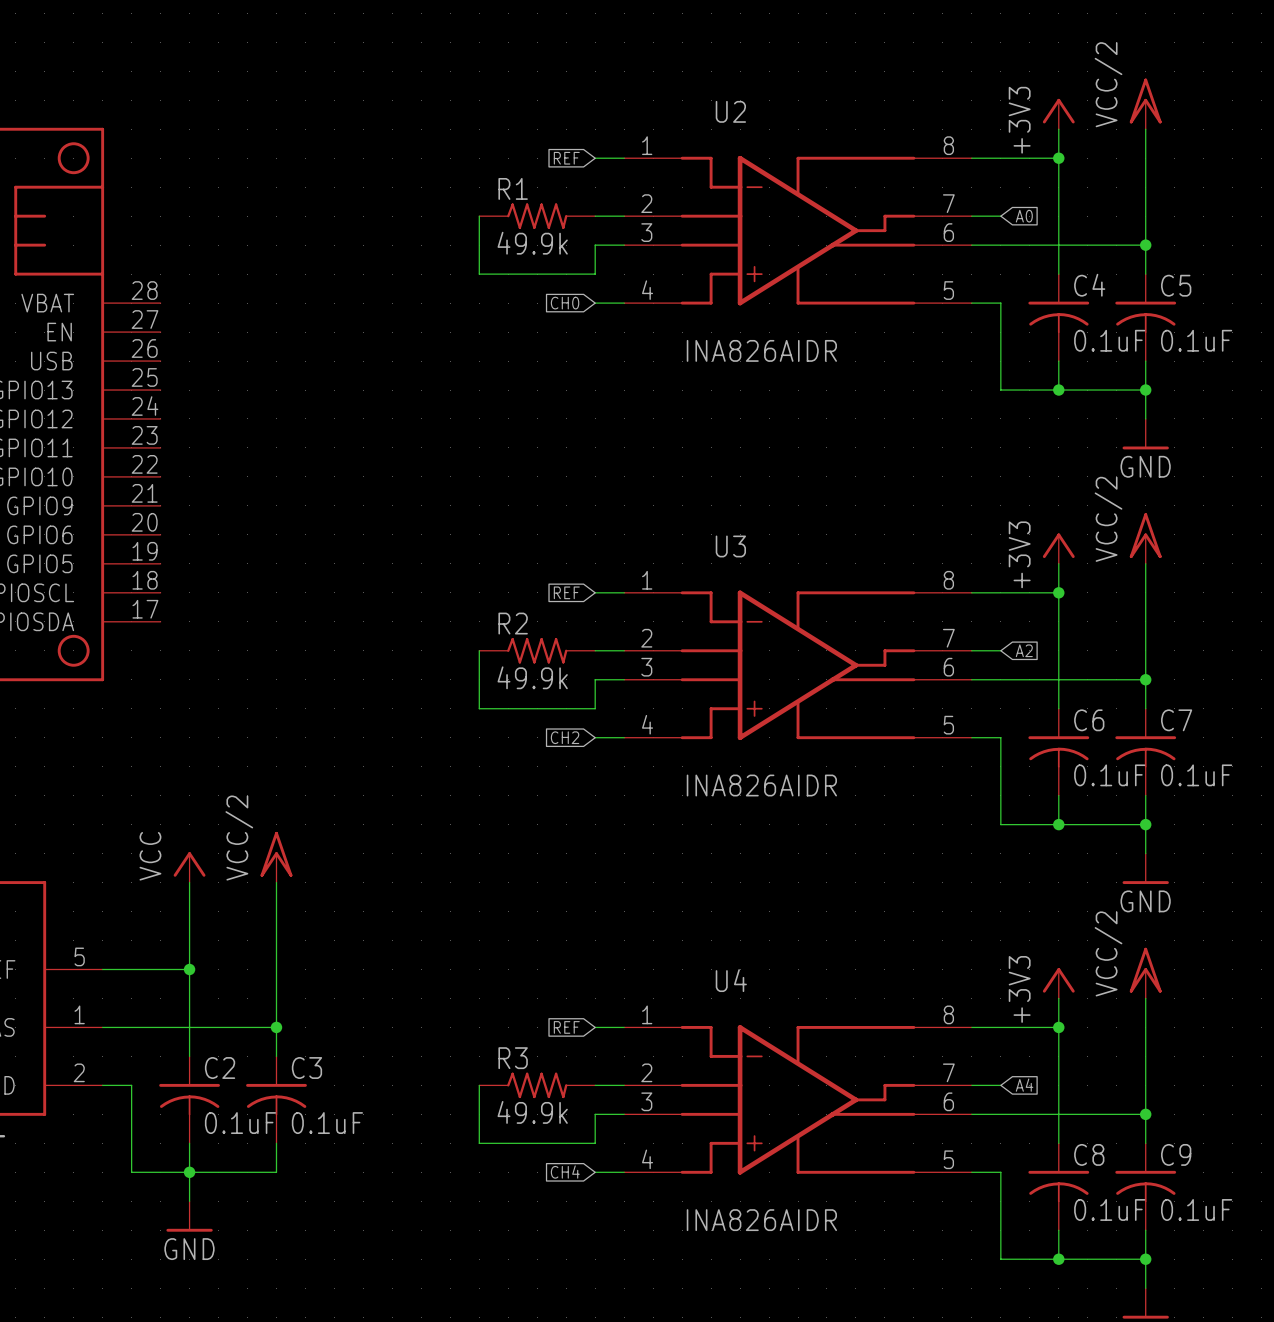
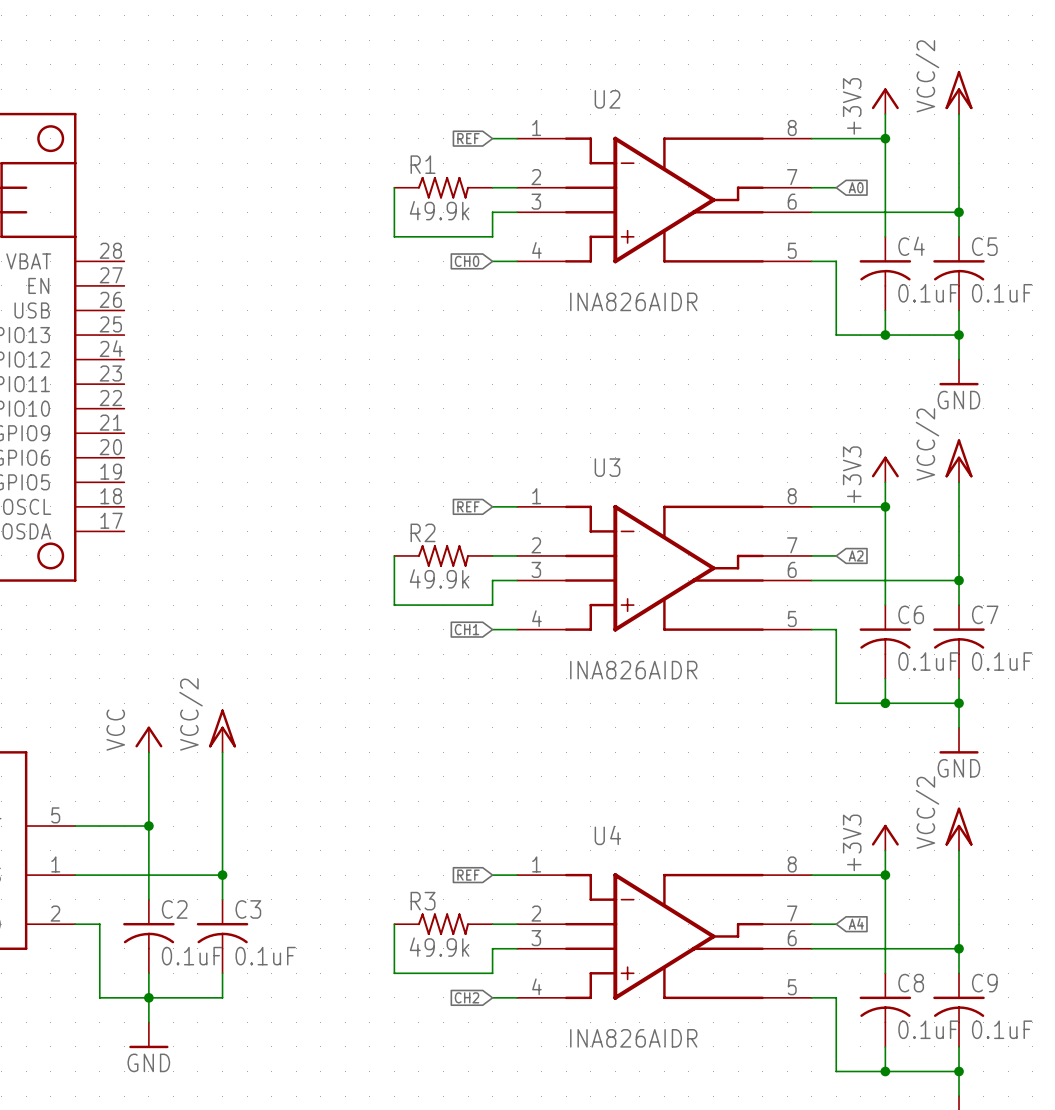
global label: CH2 (565, 737) -> CH1 (467, 629)
global label: CH4 (565, 1172) -> CH2 (467, 997)

